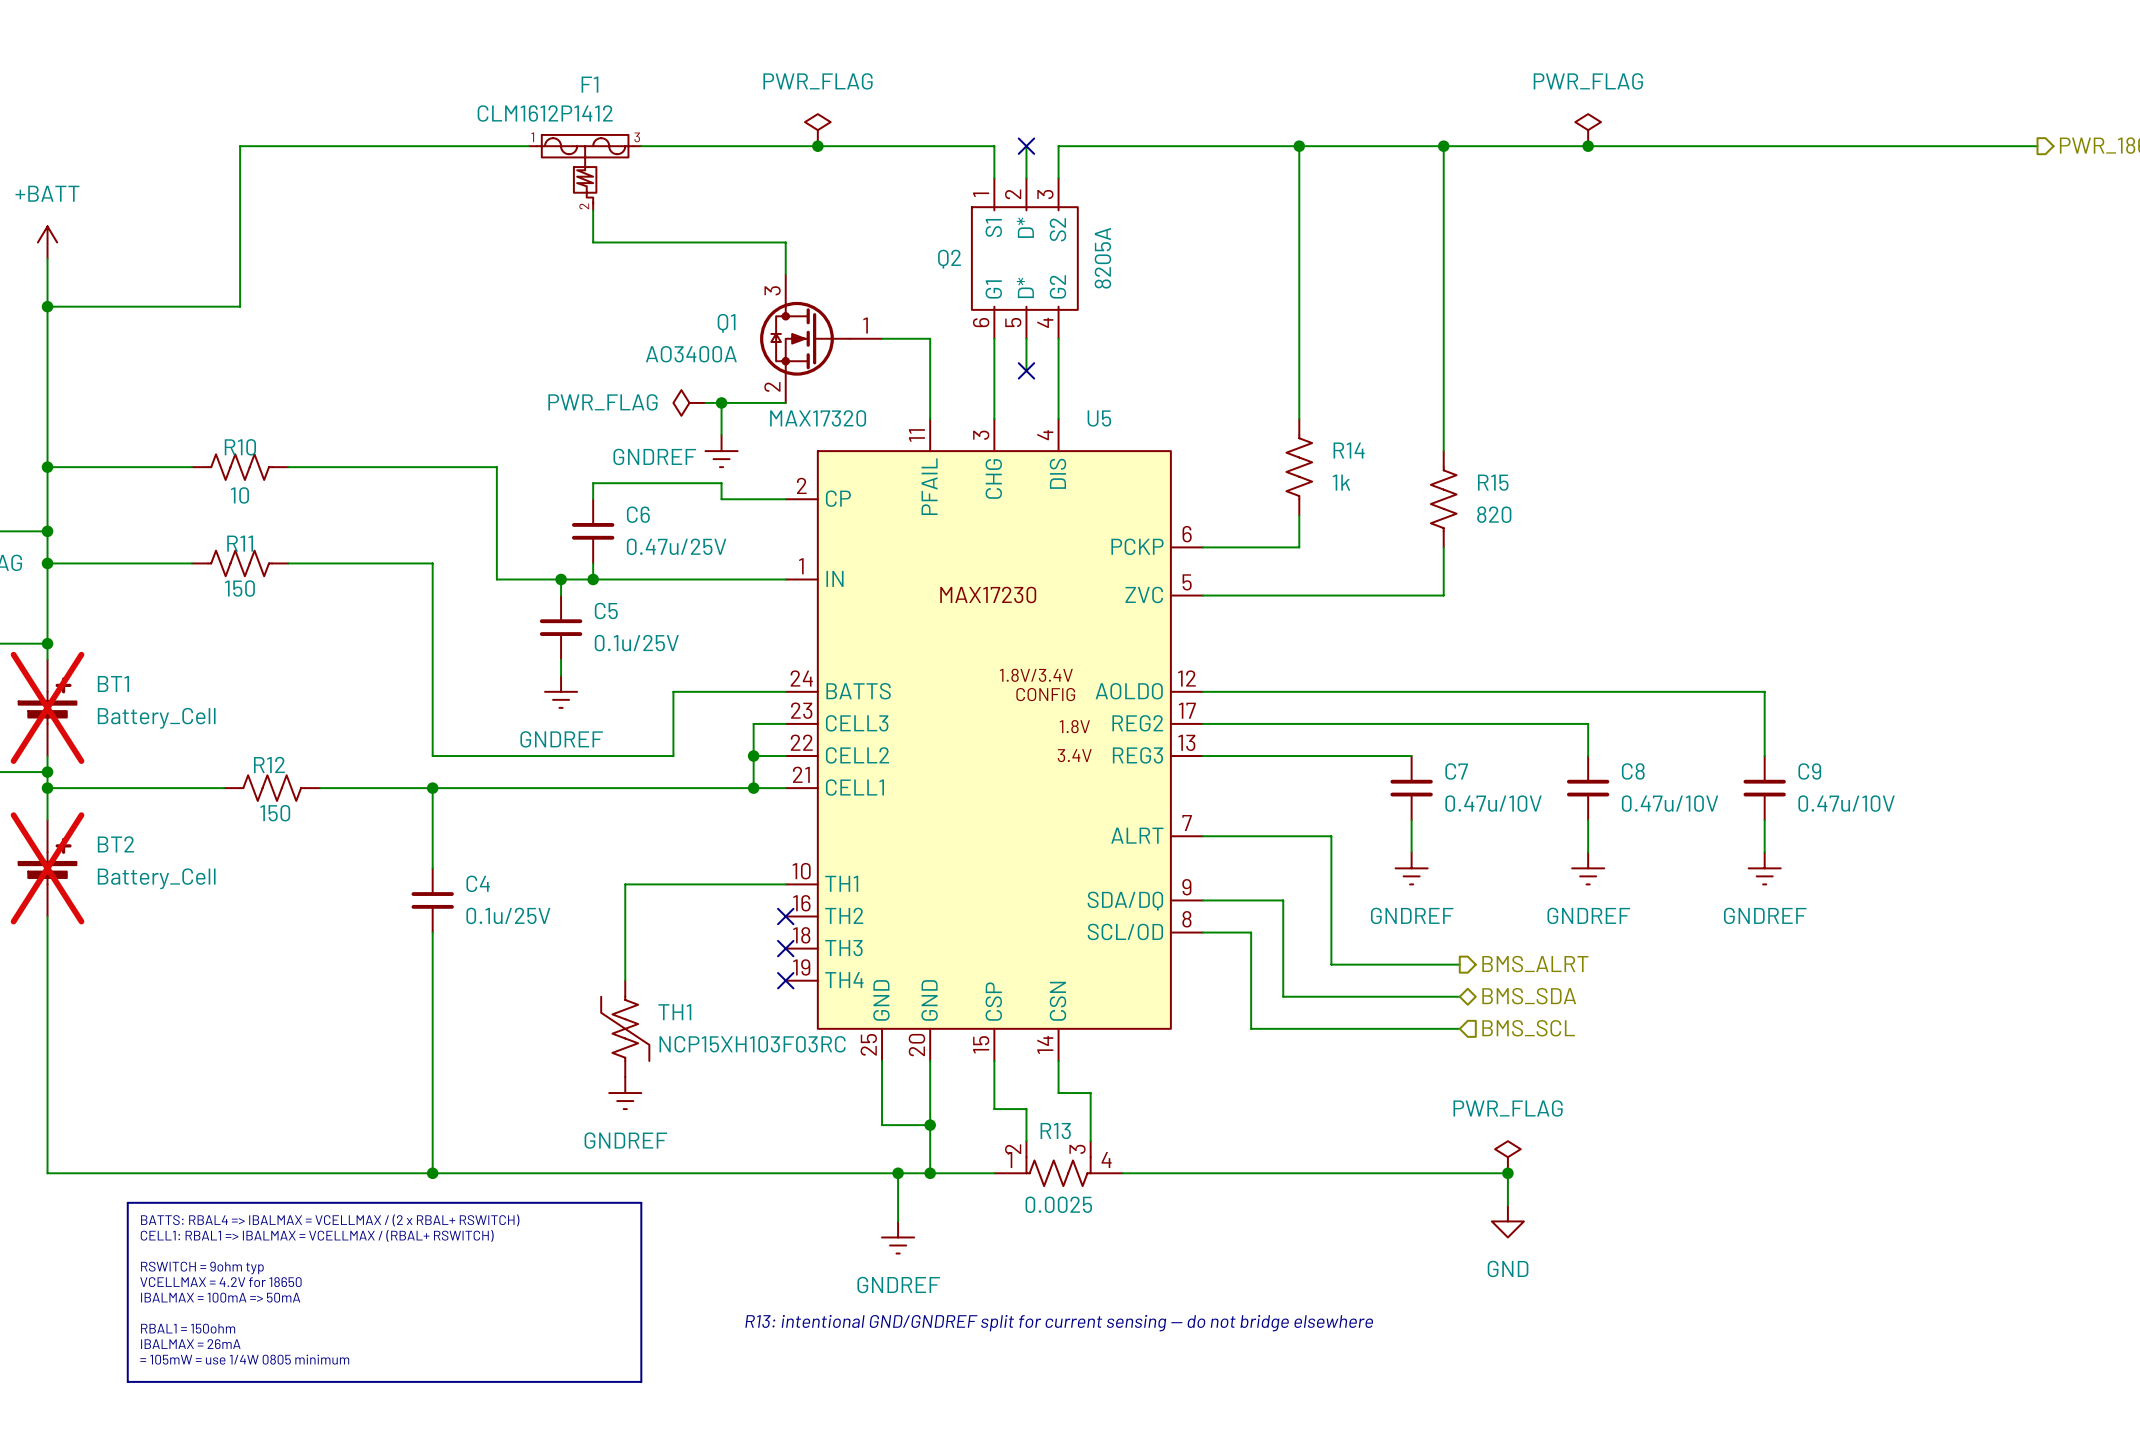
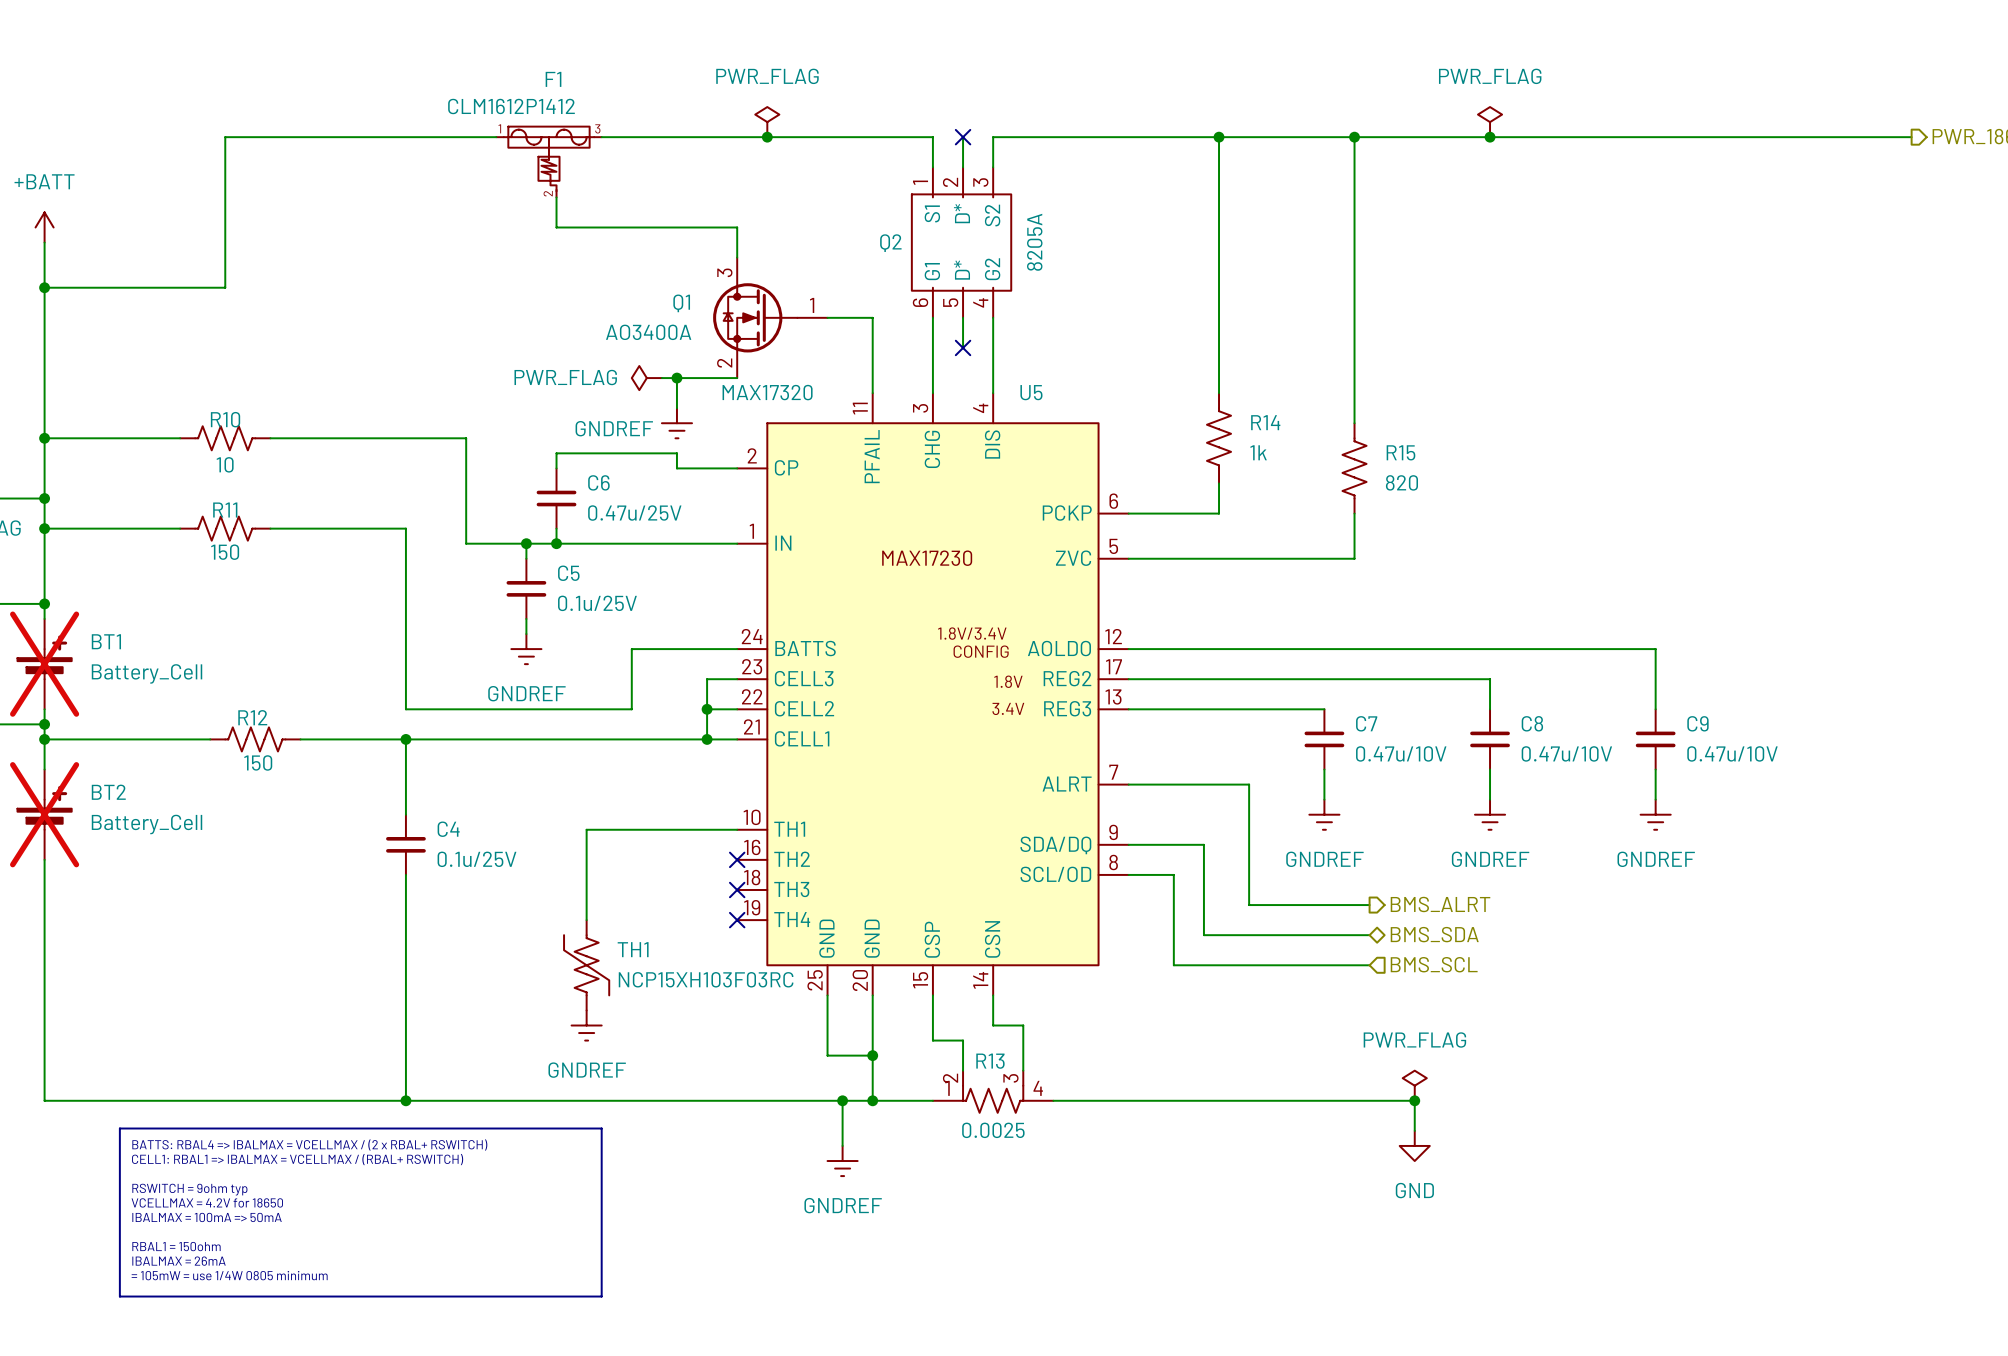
text: R13: intentional GND/GNDREF split for current sensing — do not bridge elsewhere (1059, 1323) -> none

